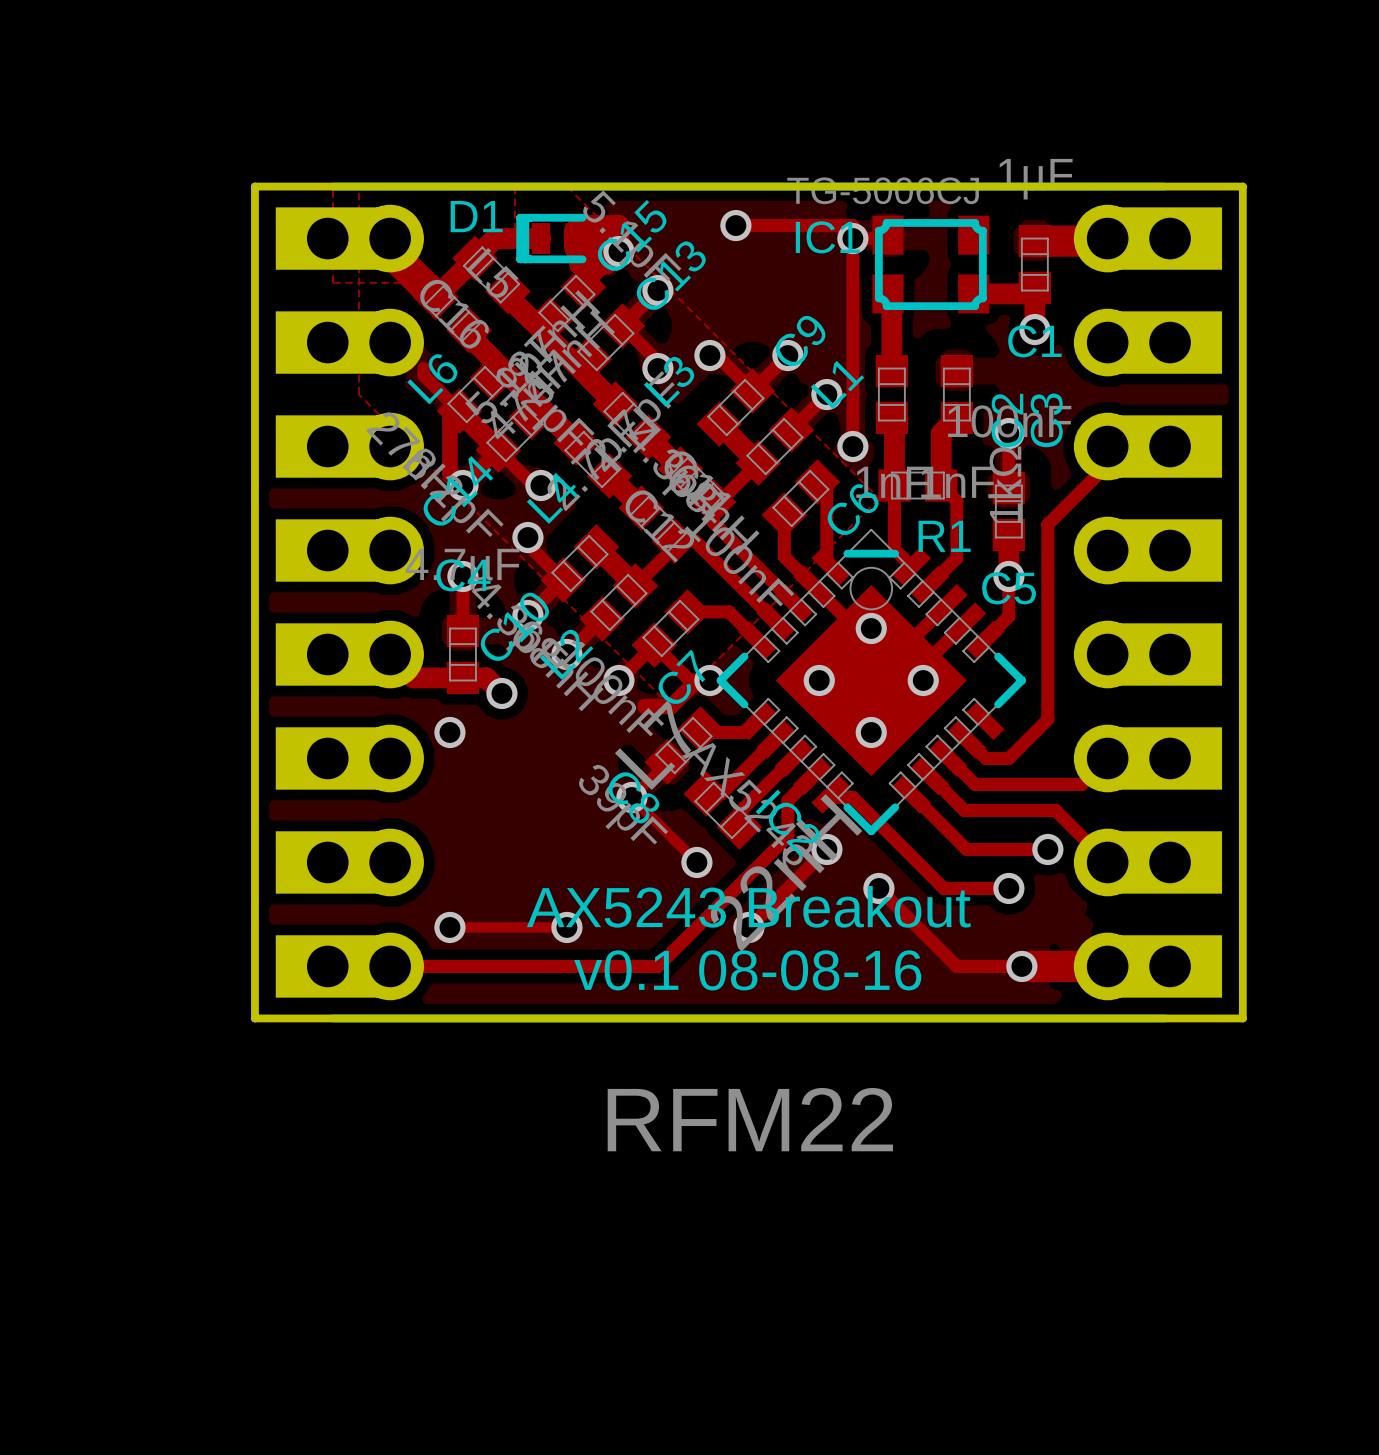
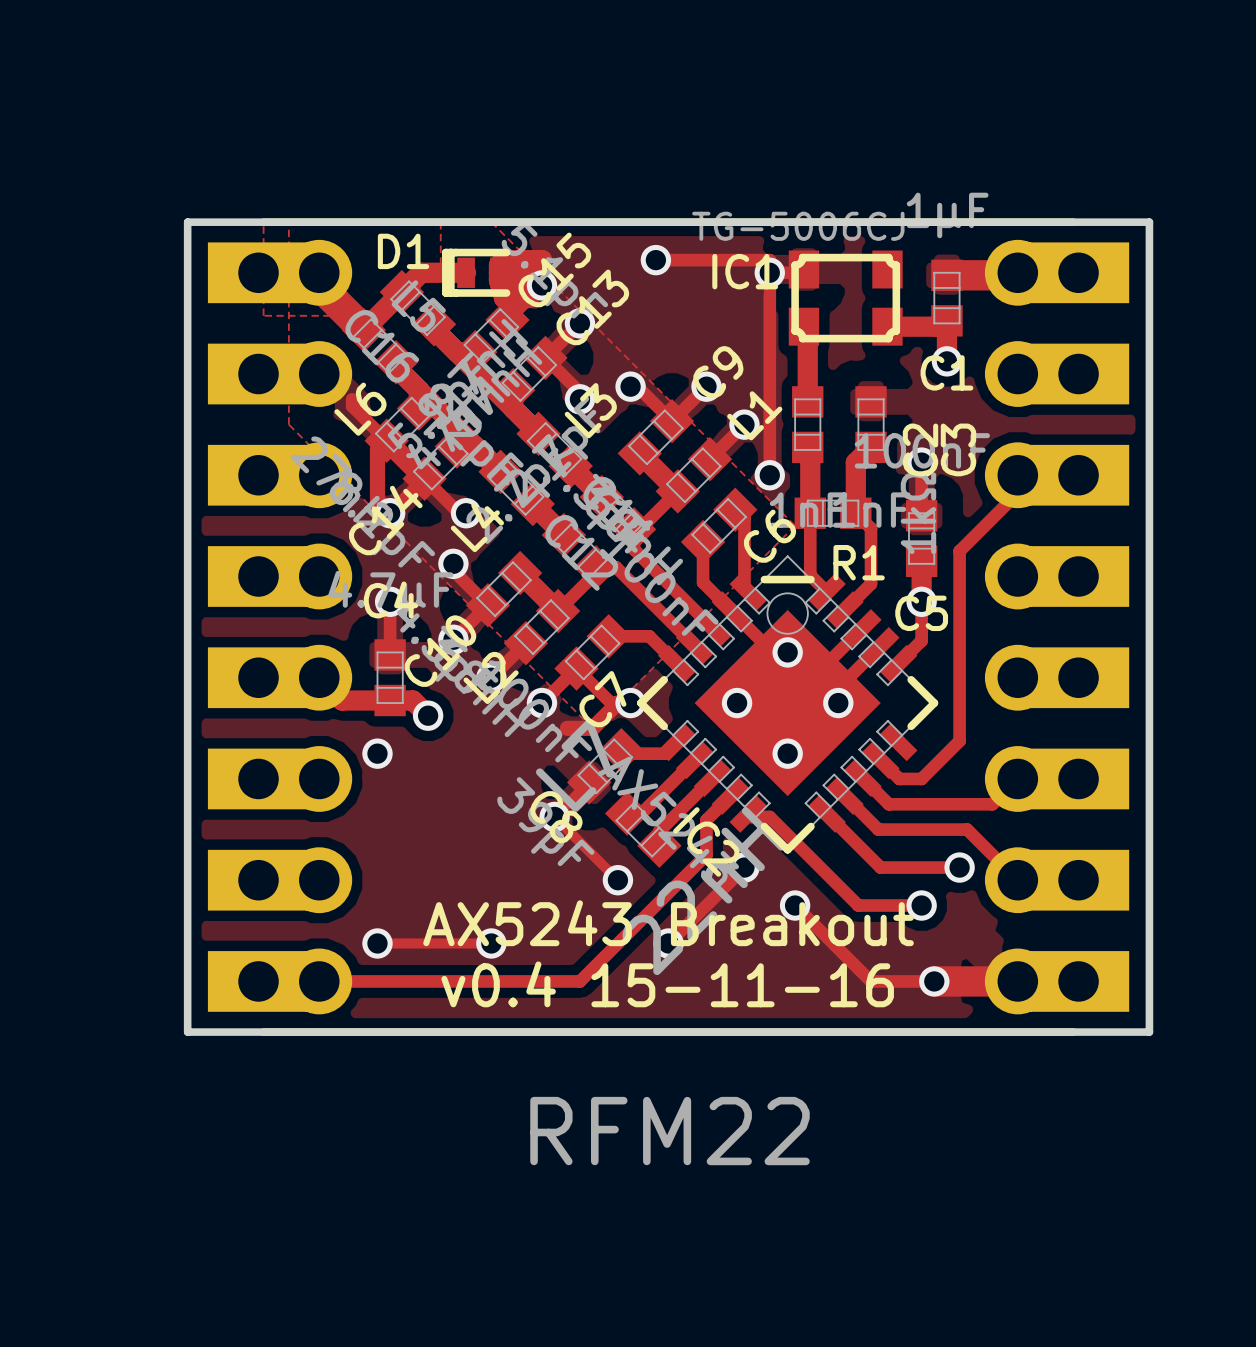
text: v0.1 08-08-16 (747, 970) -> v0.4 15-11-16 (667, 984)

